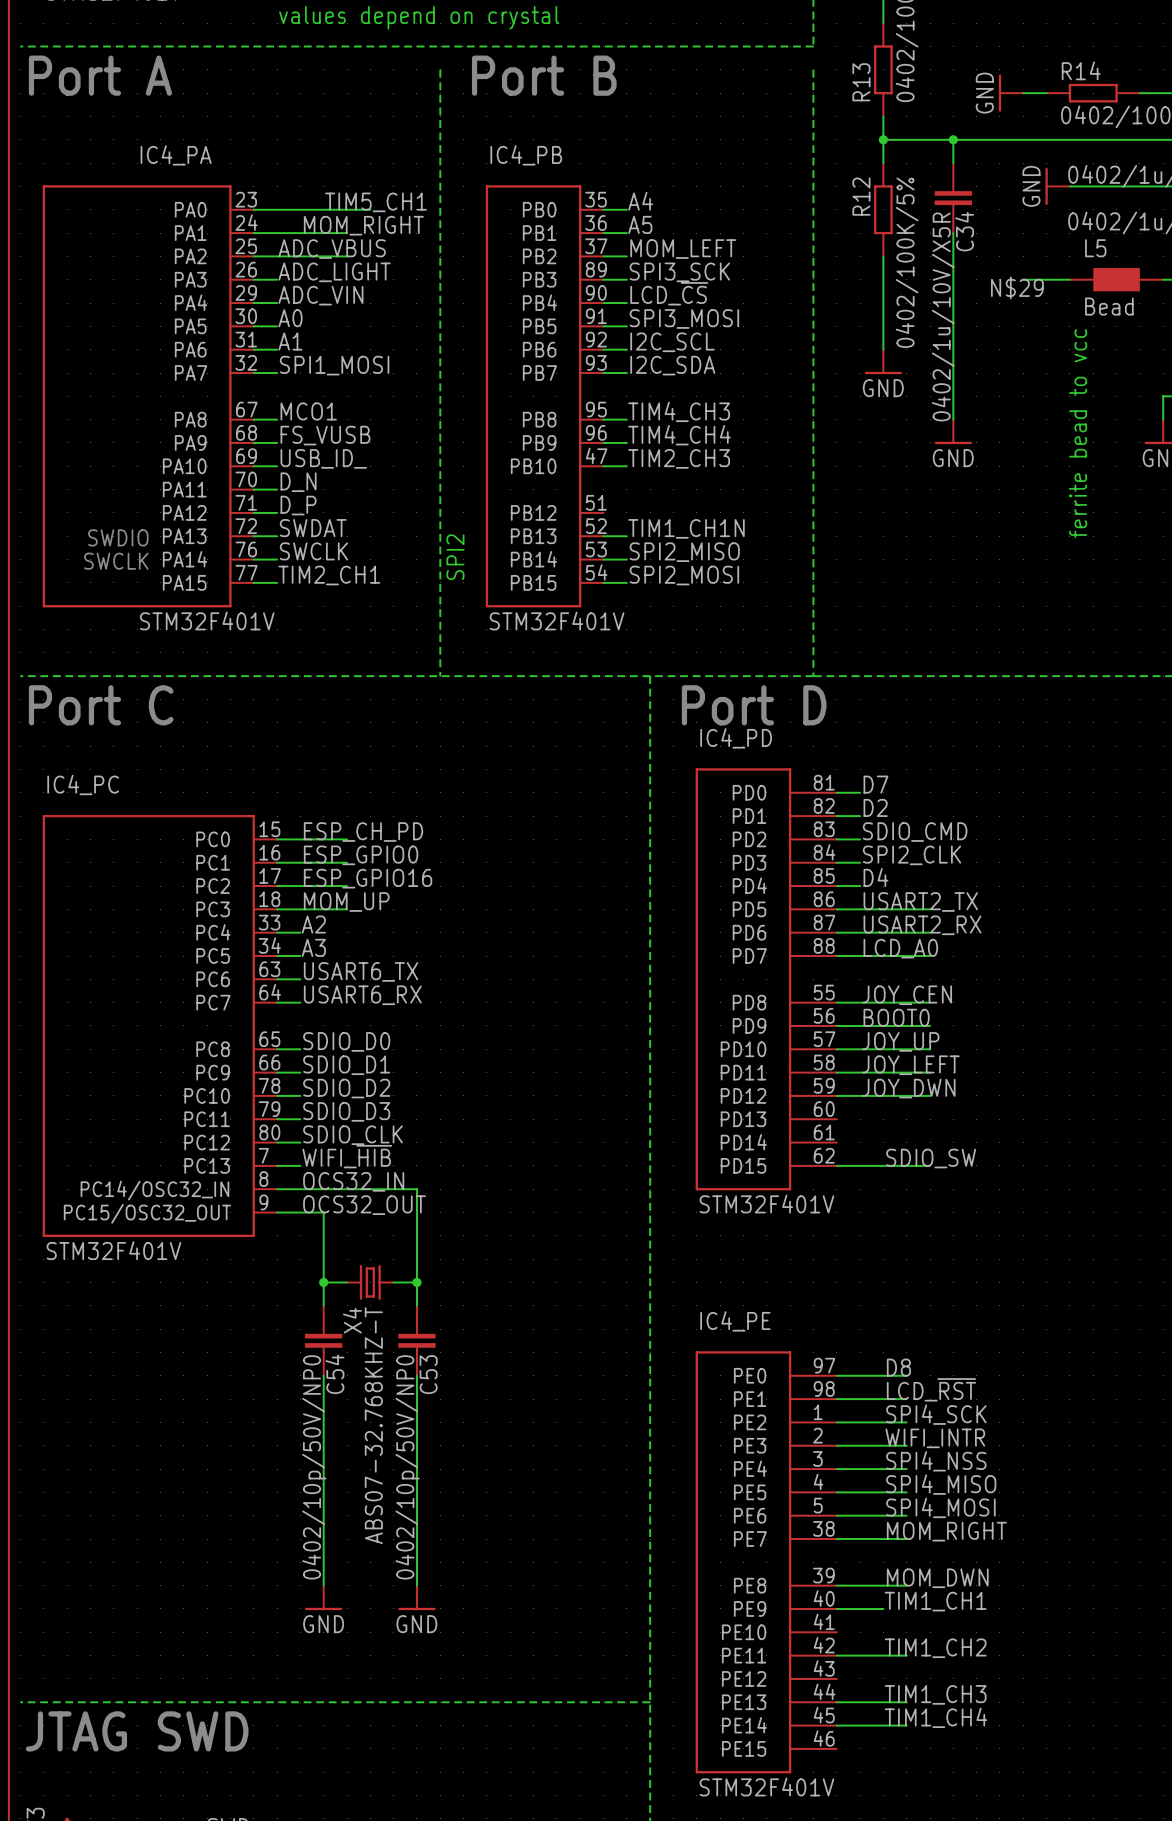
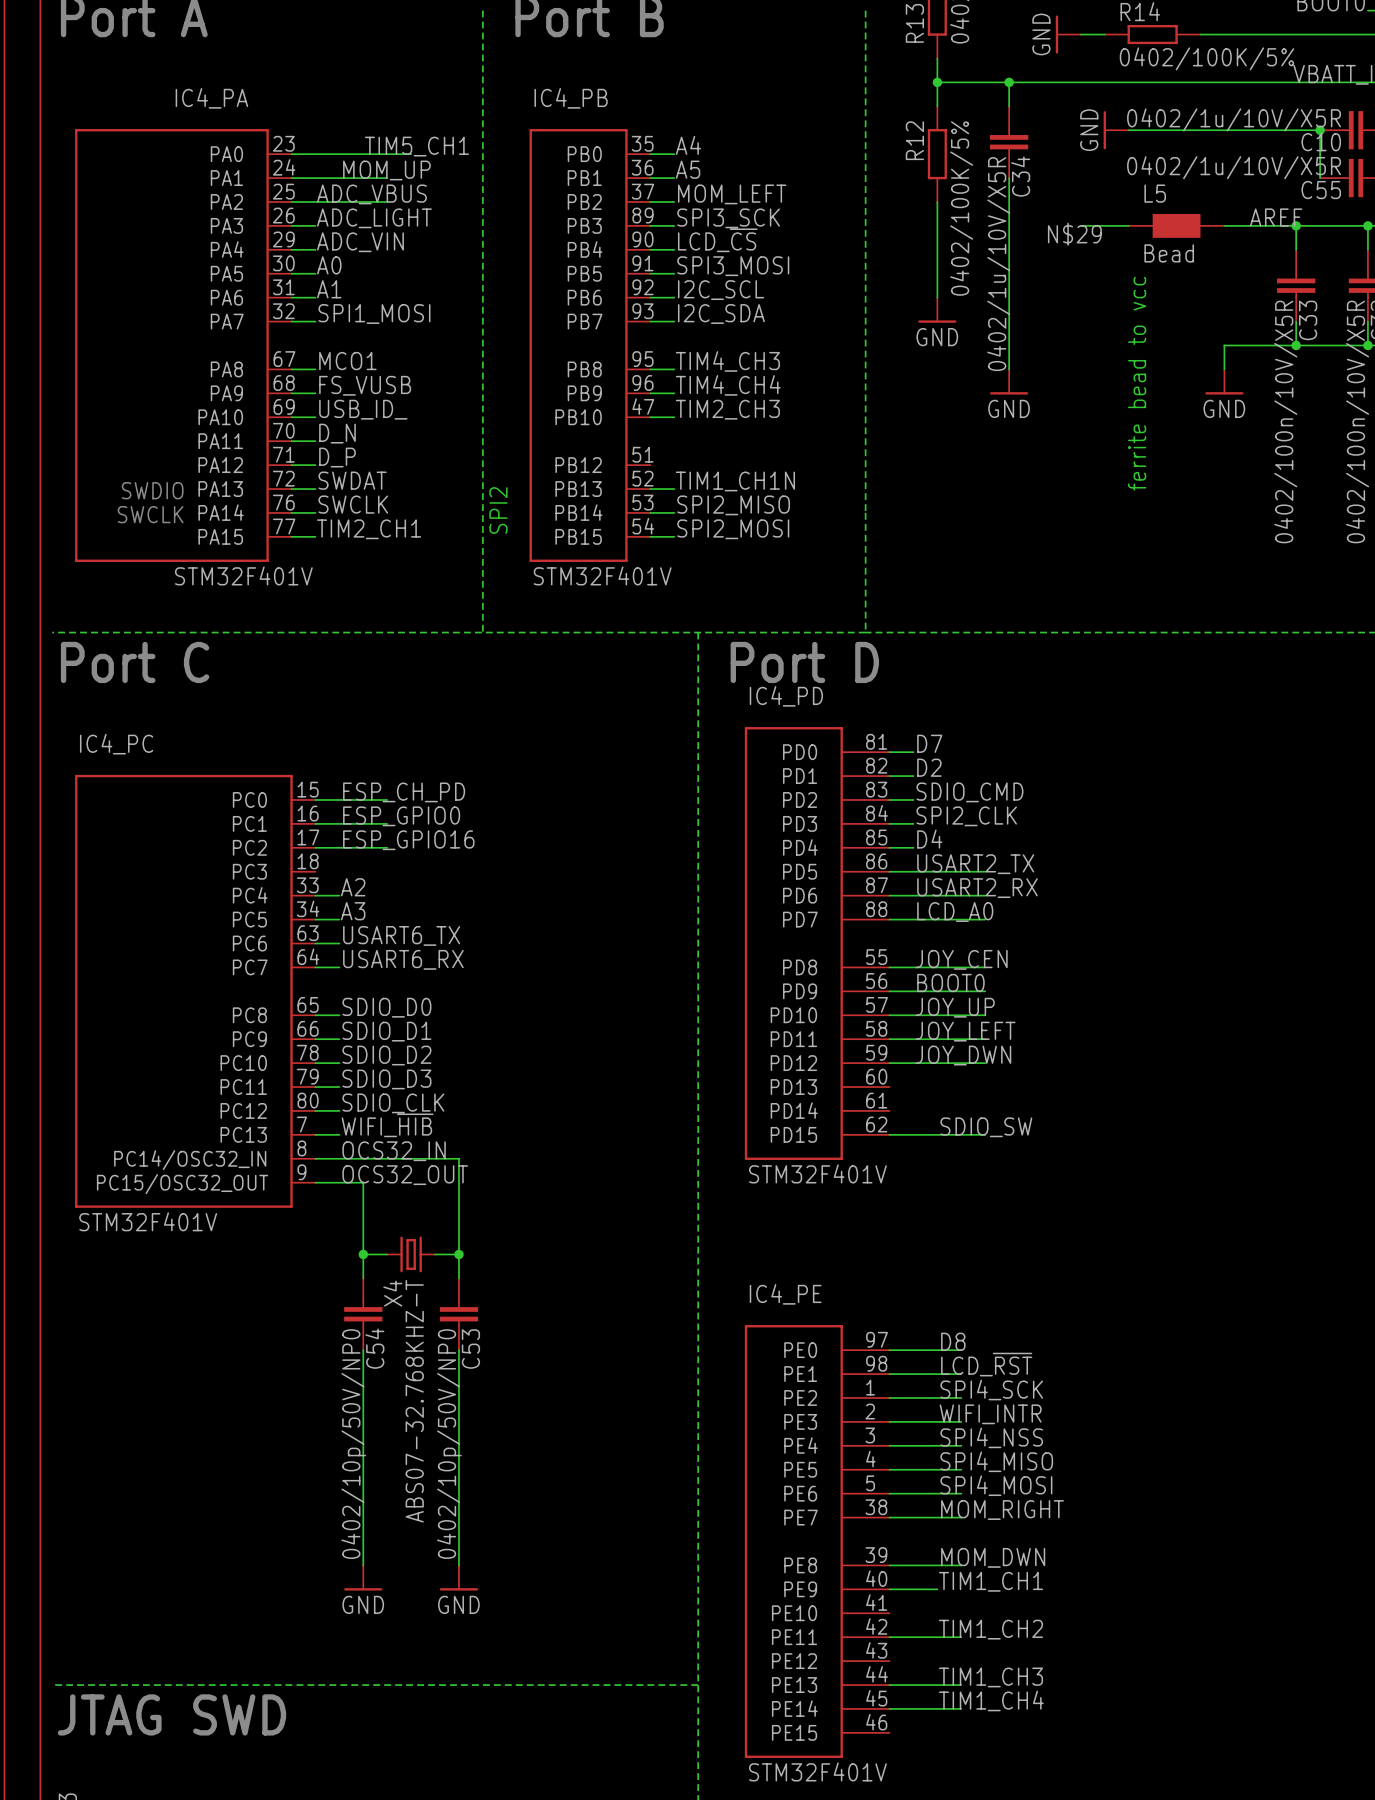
label: MOM_RIGHT (363, 225) -> MOM_UP (386, 170)
label: MOM_UP (346, 901) -> none
wire: (277, 909) (347, 909) -> none

